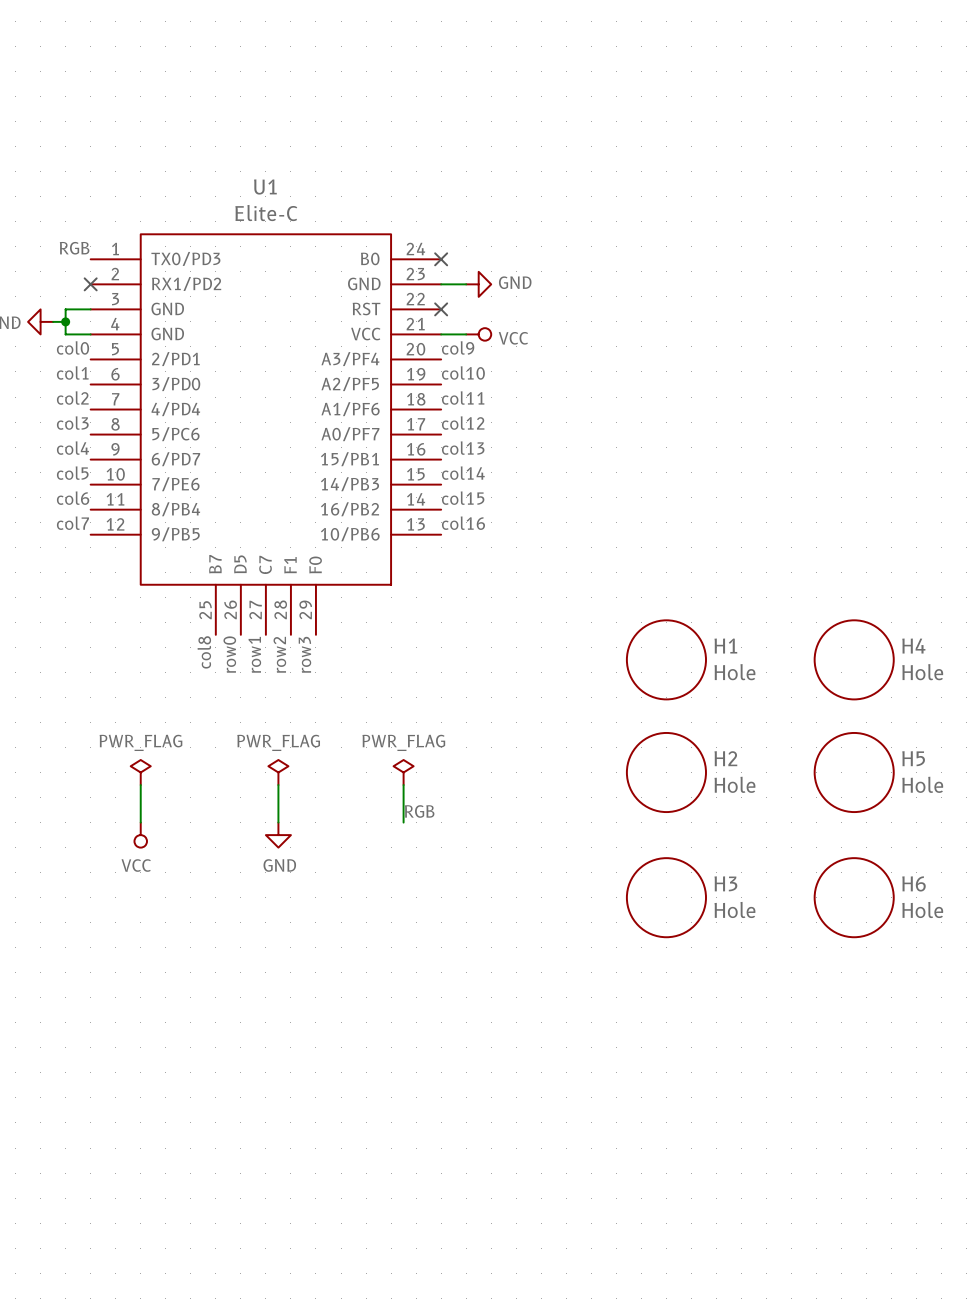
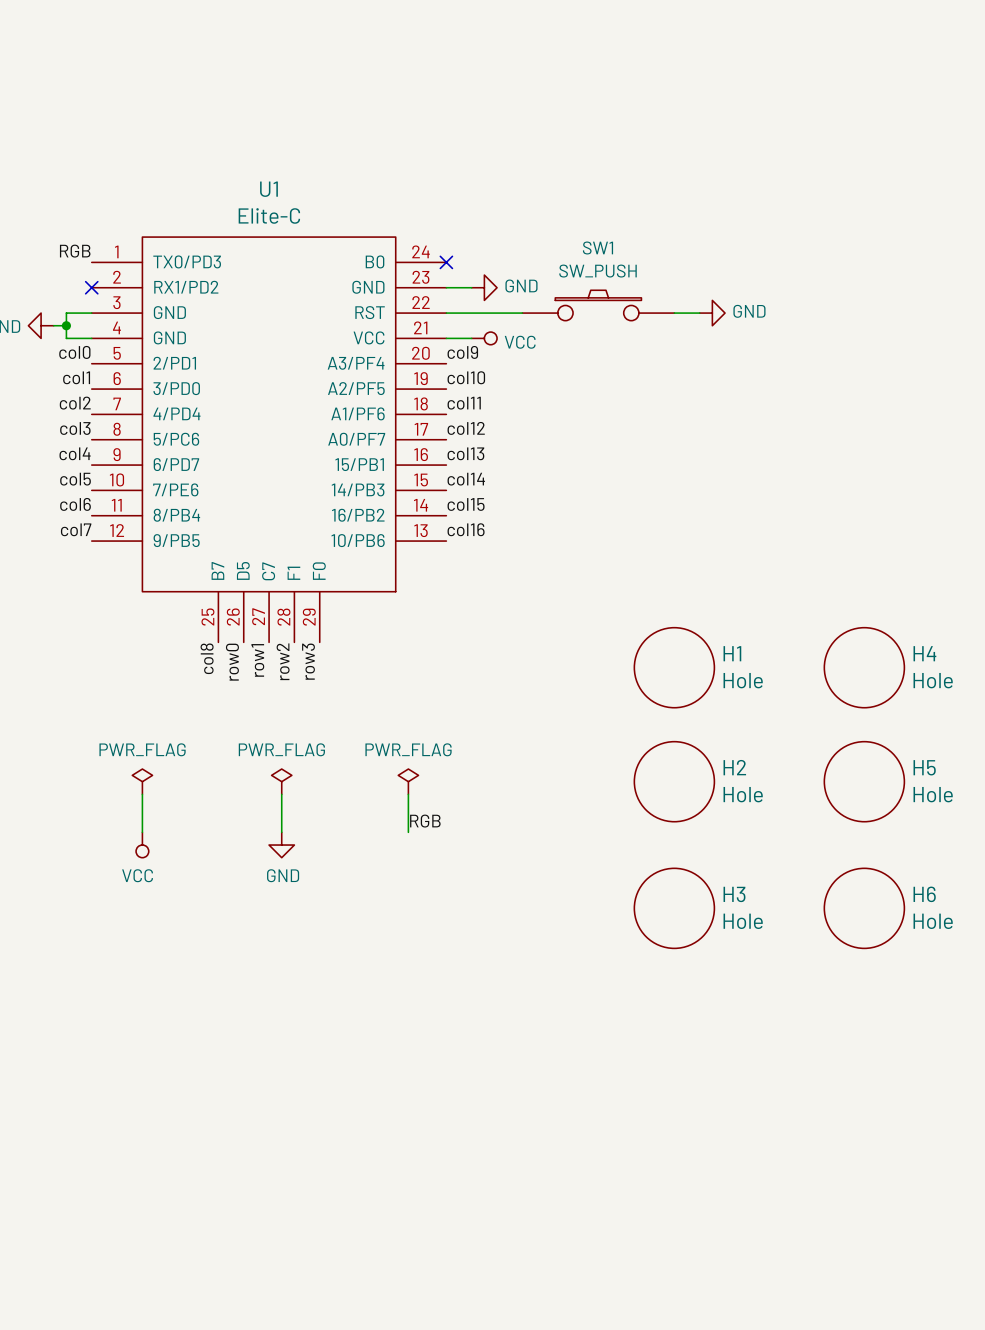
SW1: none -> SW_PUSH (598, 305)
wire: none -> (446, 313) (522, 313)
no-connect mark: (441, 309) -> none
wire: none -> (674, 313) (699, 313)
power symbol: none -> GND (712, 313)

